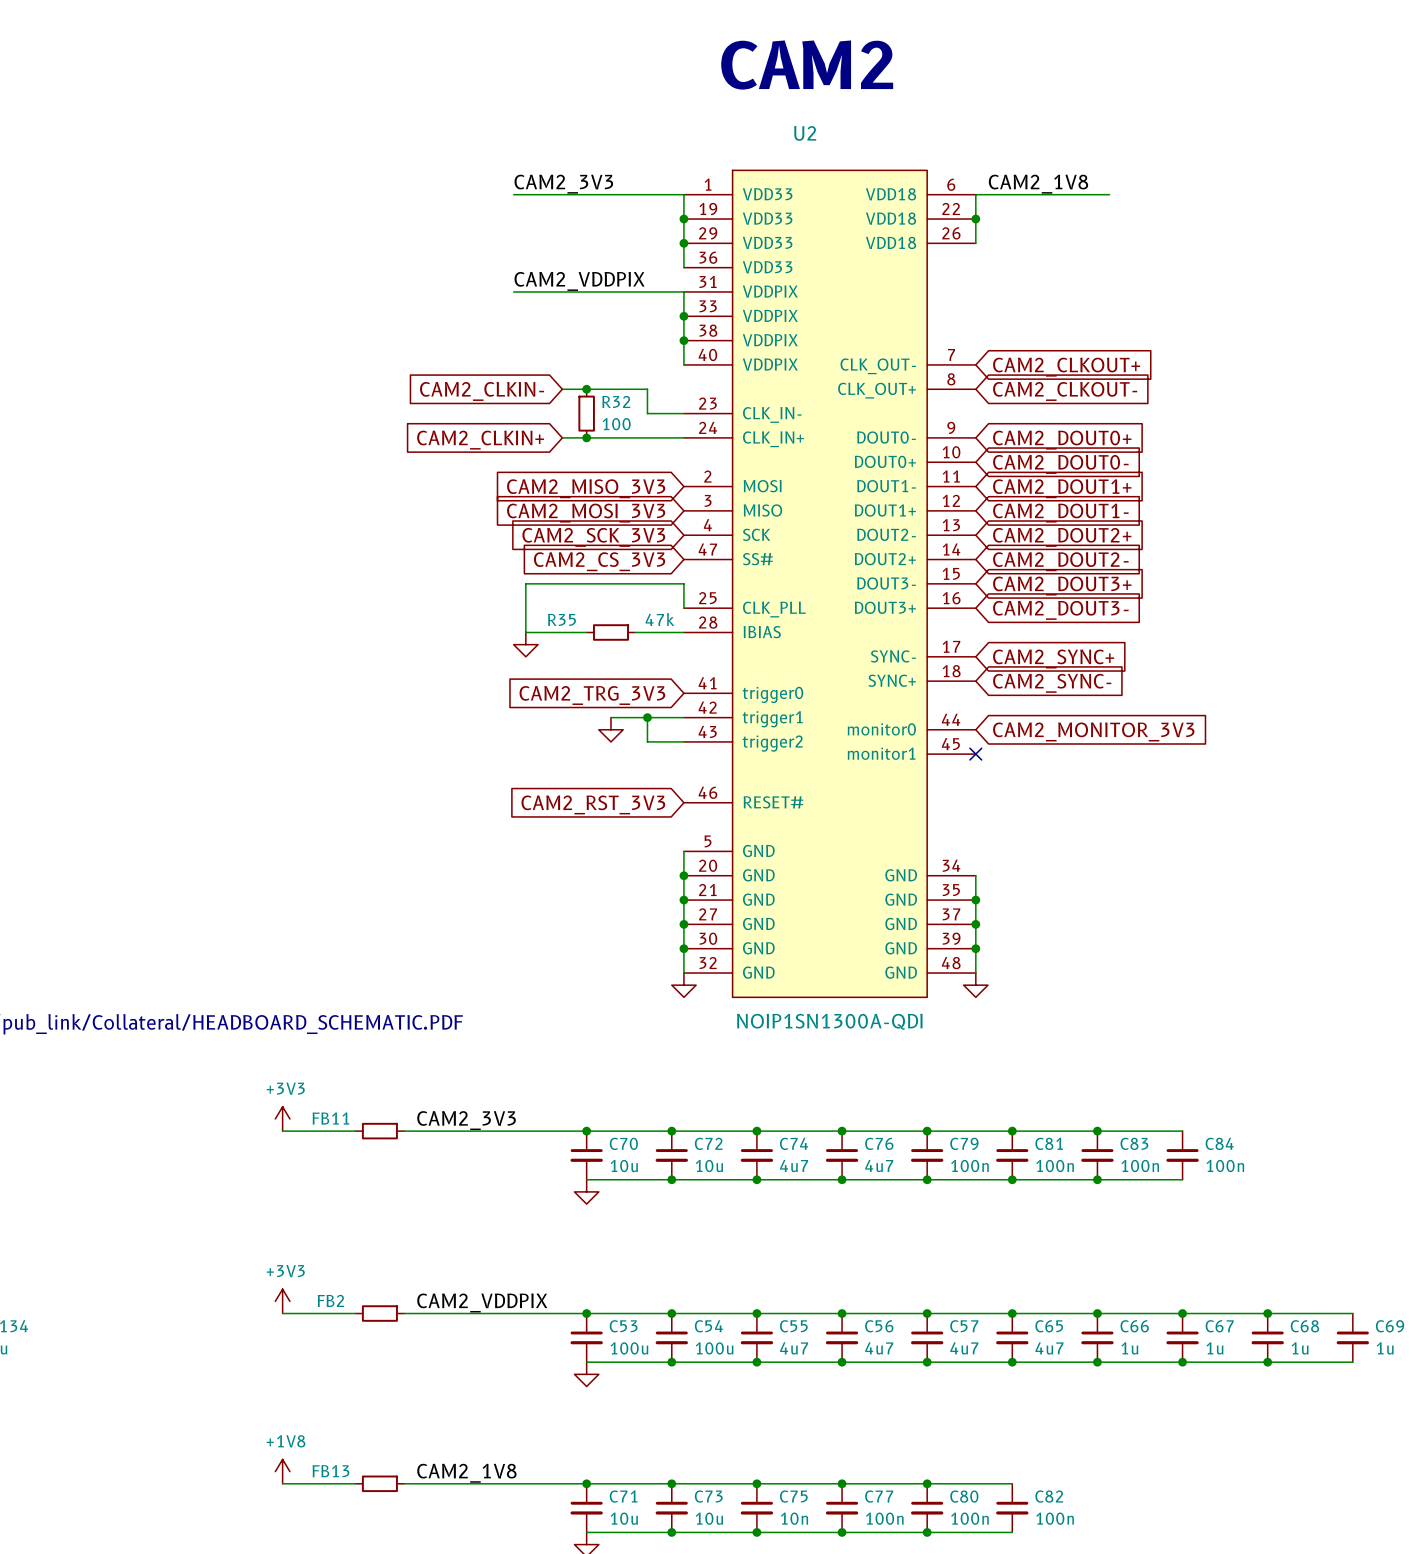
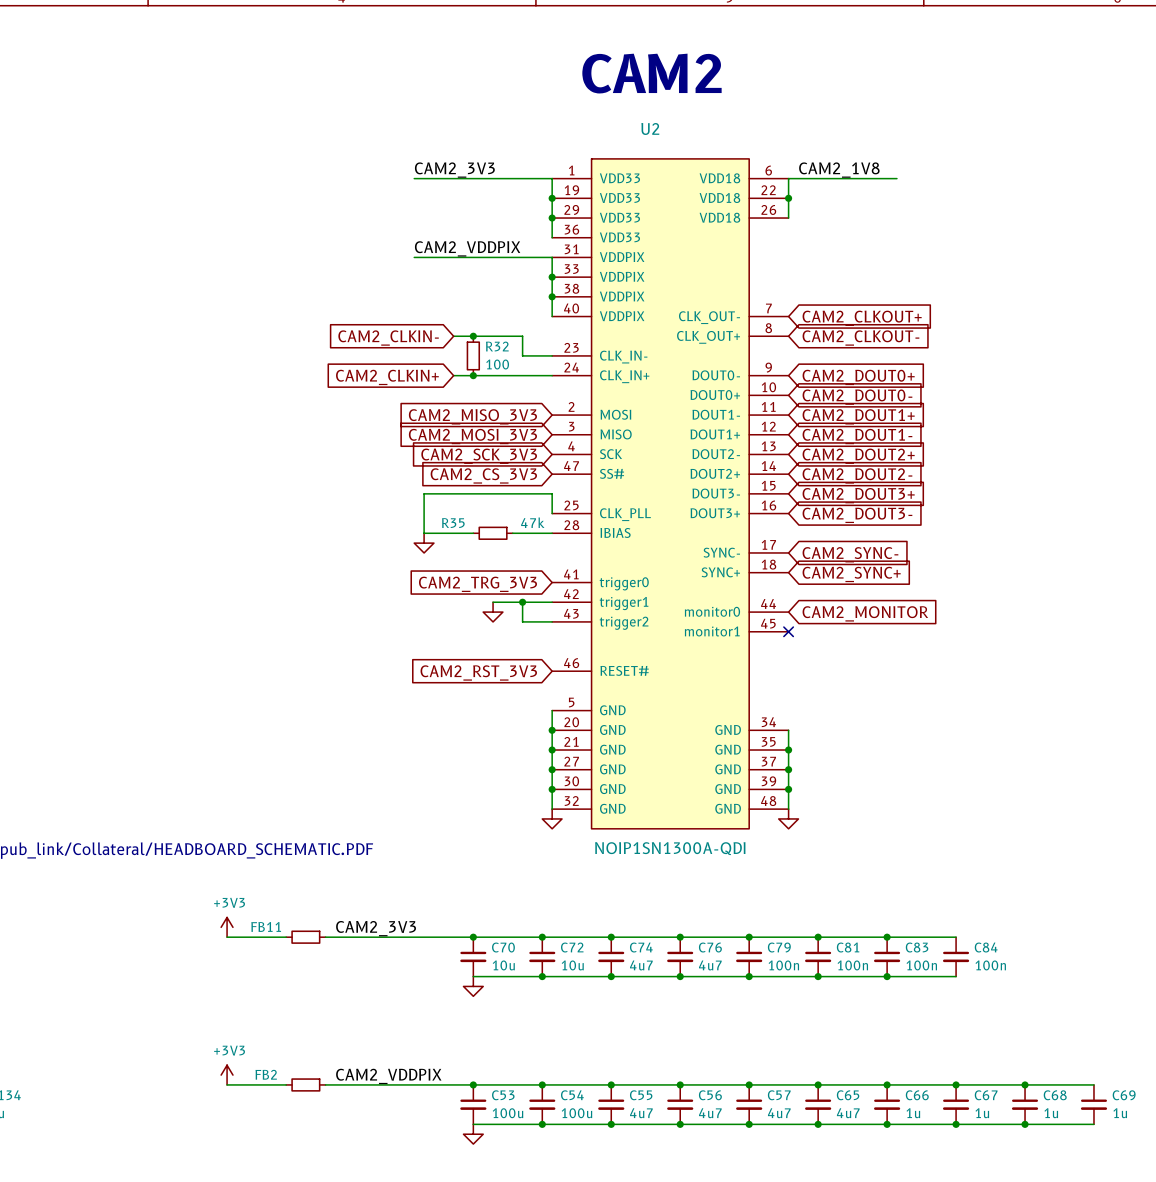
global label: CAM2_SYNC+ (1053, 659) -> CAM2_SYNC- (850, 554)
global label: CAM2_SYNC- (1052, 683) -> CAM2_SYNC+ (851, 574)
global label: CAM2_MONITOR_3V3 (1093, 731) -> CAM2_MONITOR (865, 613)

